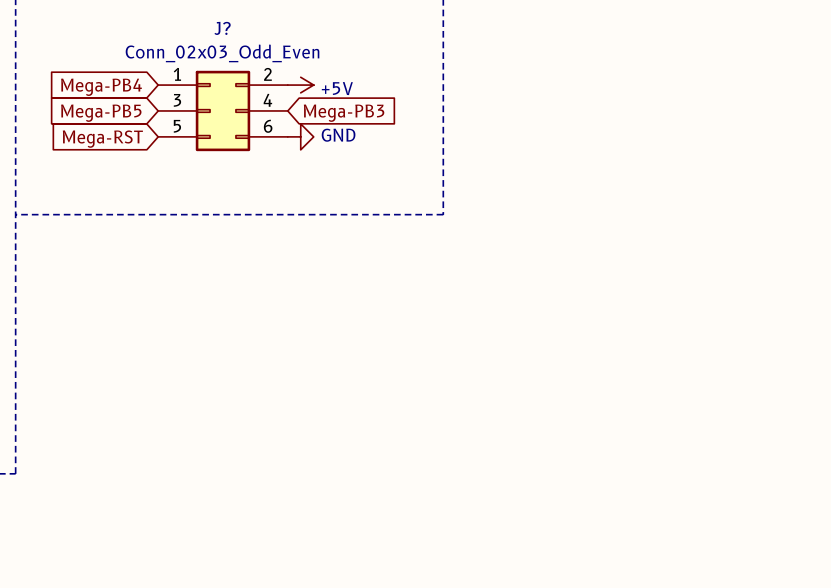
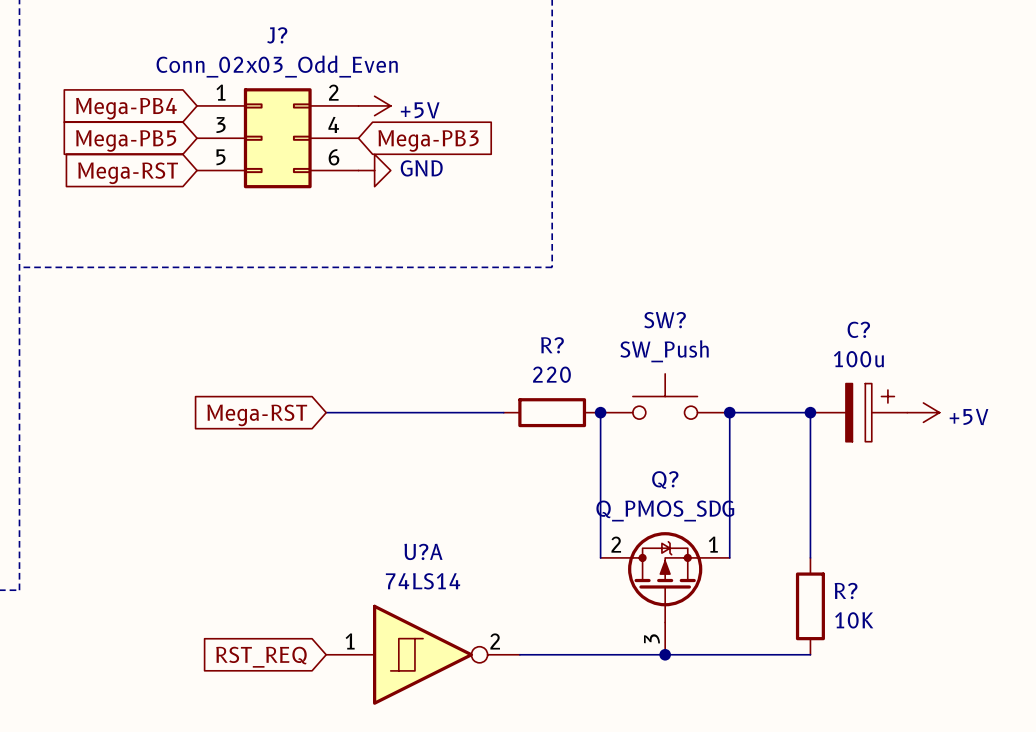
SW?: none -> SW_Push (665, 396)
wire: none -> (326, 412) (503, 412)
R?: none -> 220 (552, 412)
wire: none -> (600, 412) (600, 557)
junction: none -> (600, 412)
junction: none -> (729, 412)
junction: none -> (810, 412)
C?: none -> 100u (858, 412)
power symbol: none -> +5V (923, 412)
global label: none -> Mega-RST (257, 415)
wire: none -> (729, 557) (729, 412) (810, 412) (810, 557)
Q?: none -> Q_PMOS_SDG (665, 593)
R?: none -> 10K (810, 606)
U?A: none -> 74LS14 (423, 654)
wire: none -> (519, 654) (810, 654)
junction: none -> (665, 654)
global label: none -> RST_REQ (261, 657)

